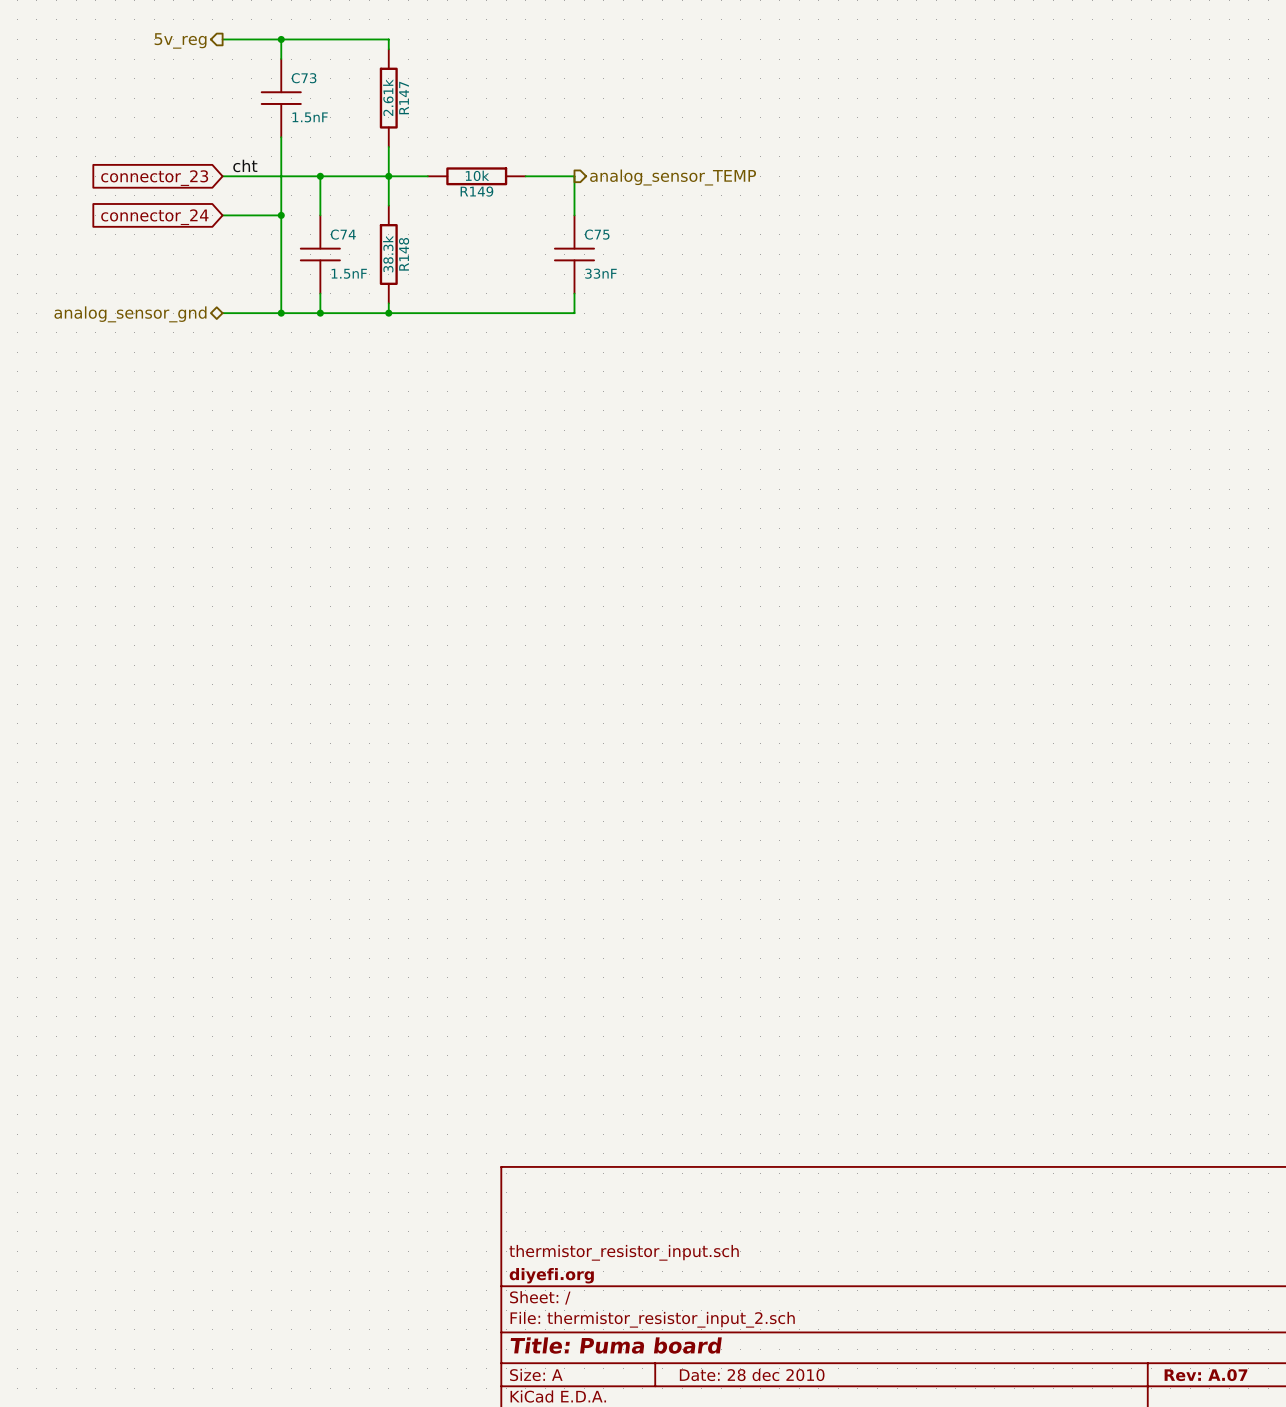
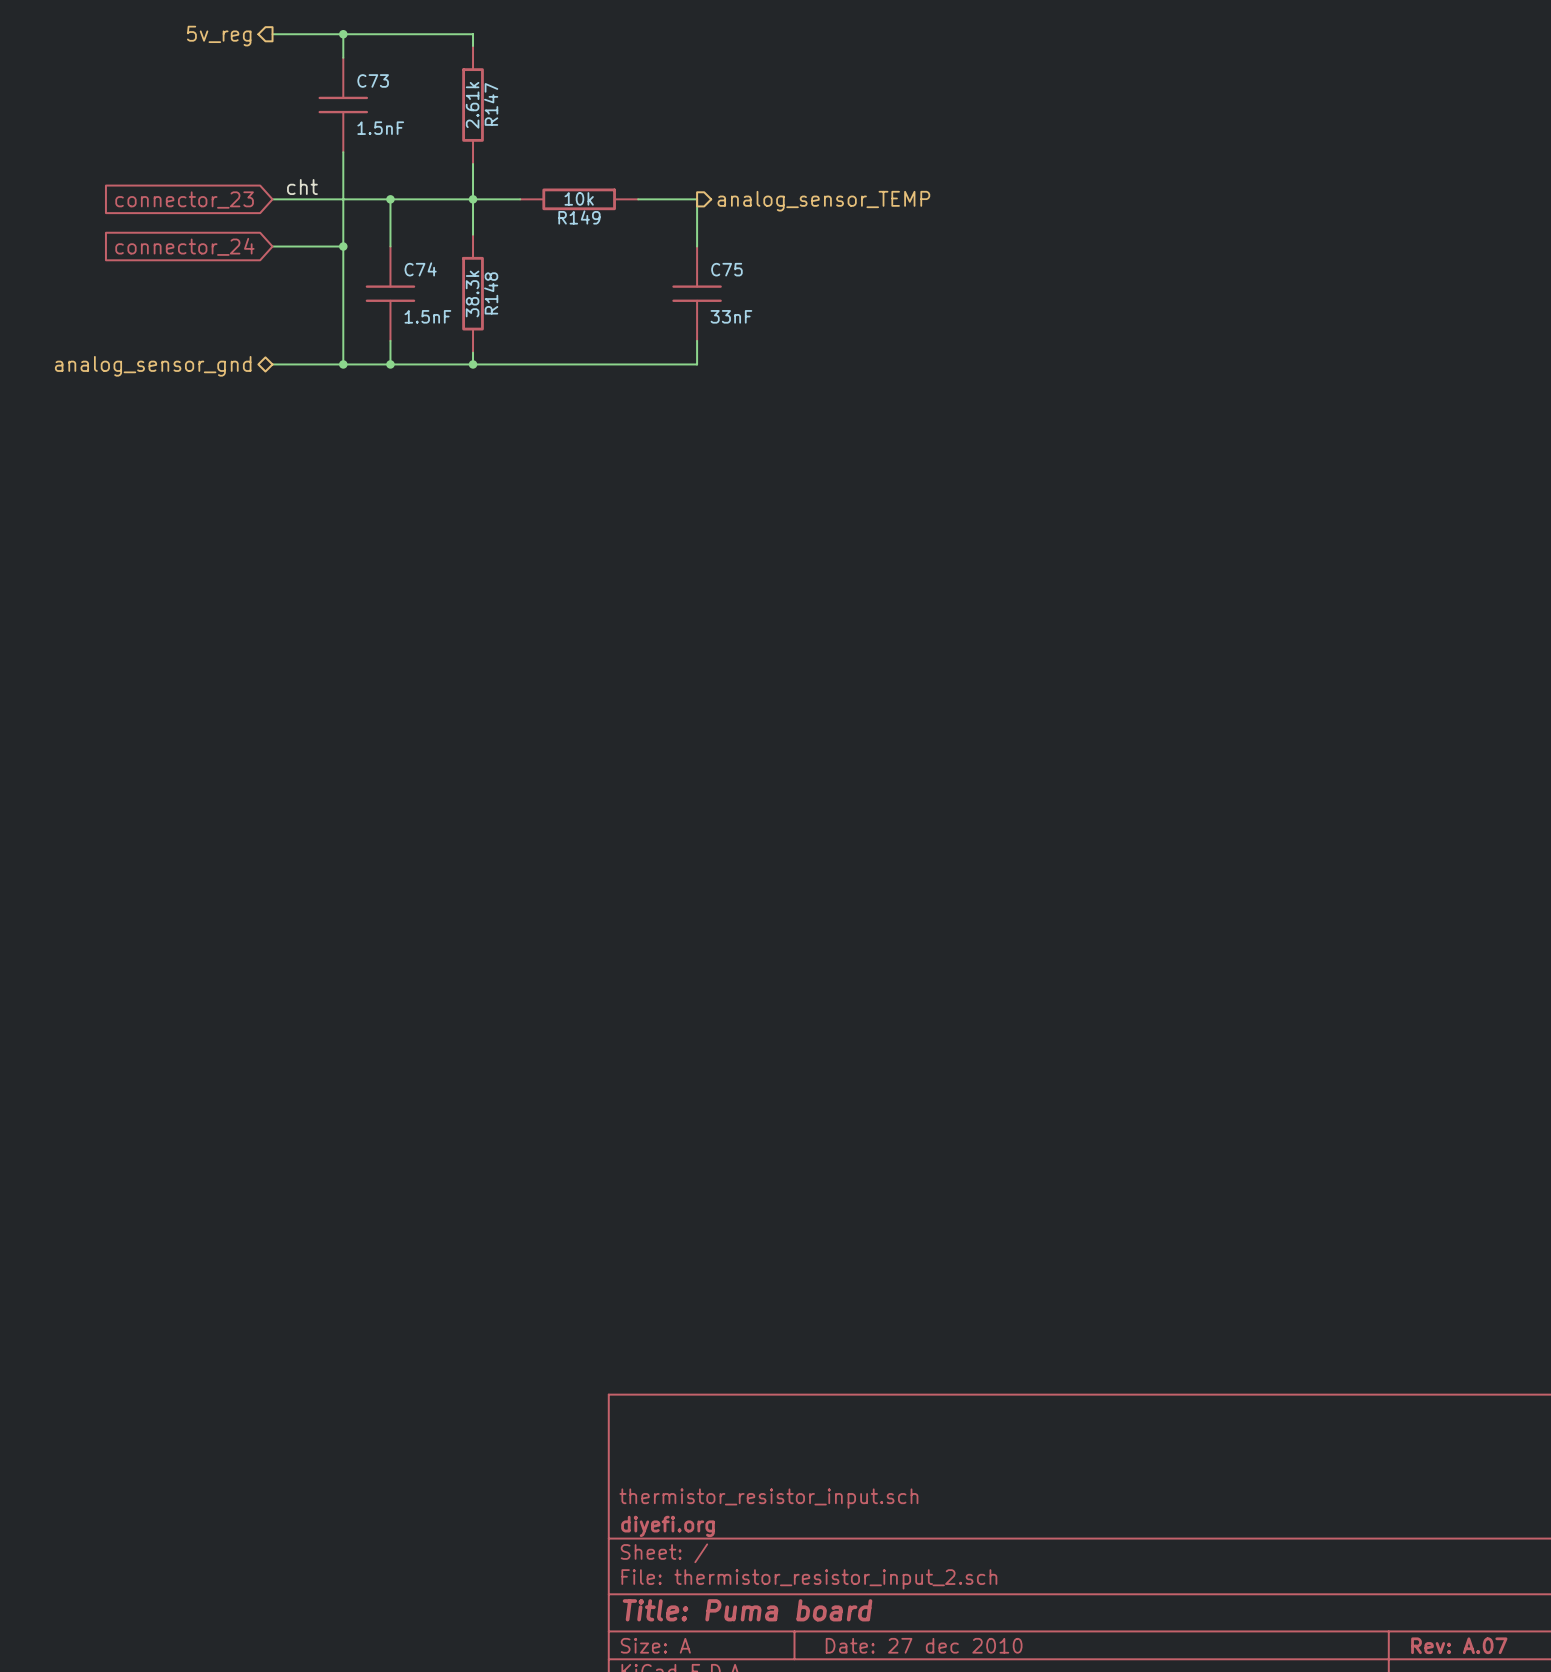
title block: Date: 28 dec 2010 (752, 1374) -> Date: 27 dec 2010 (924, 1645)

